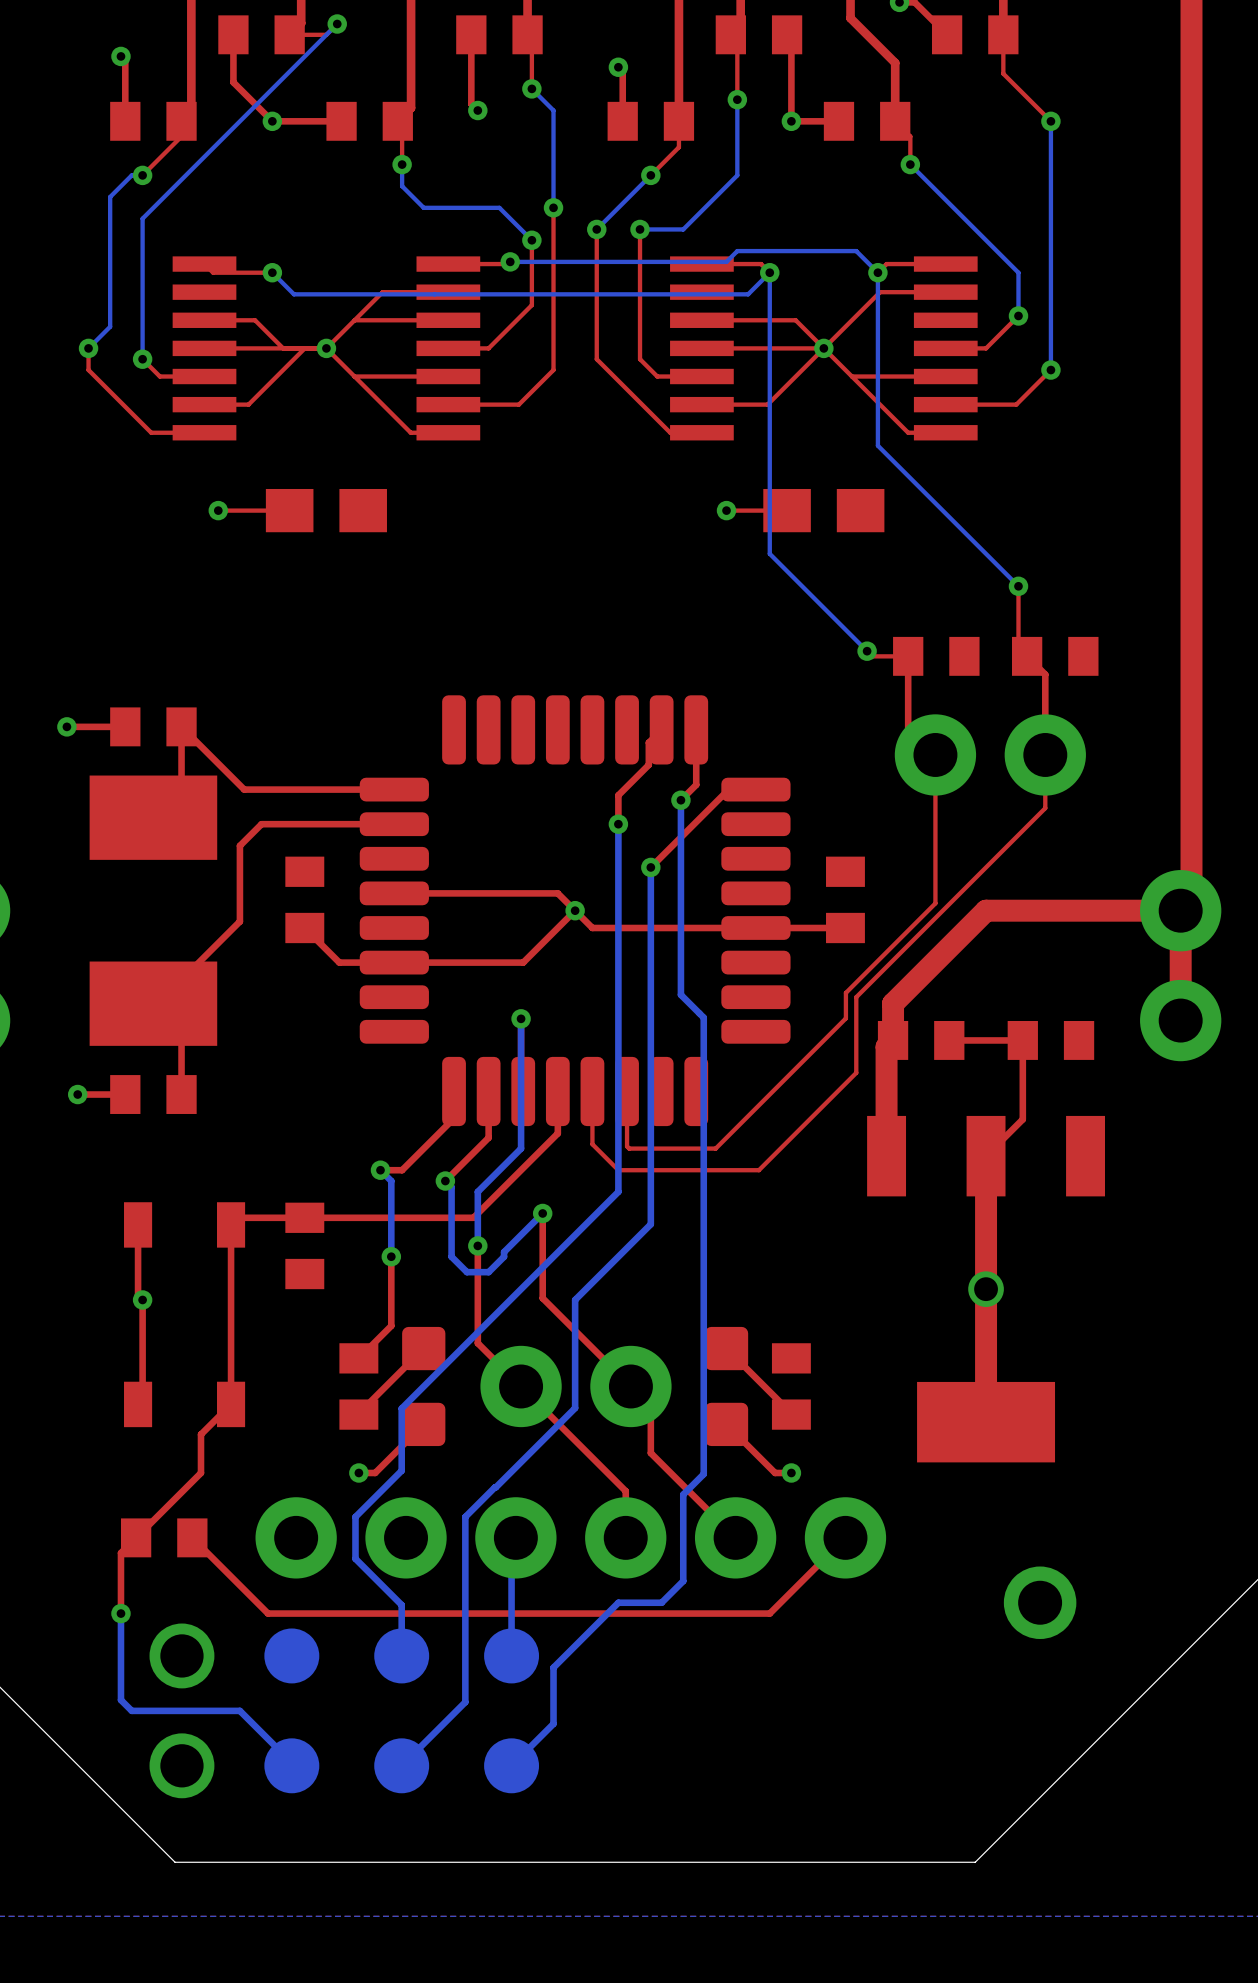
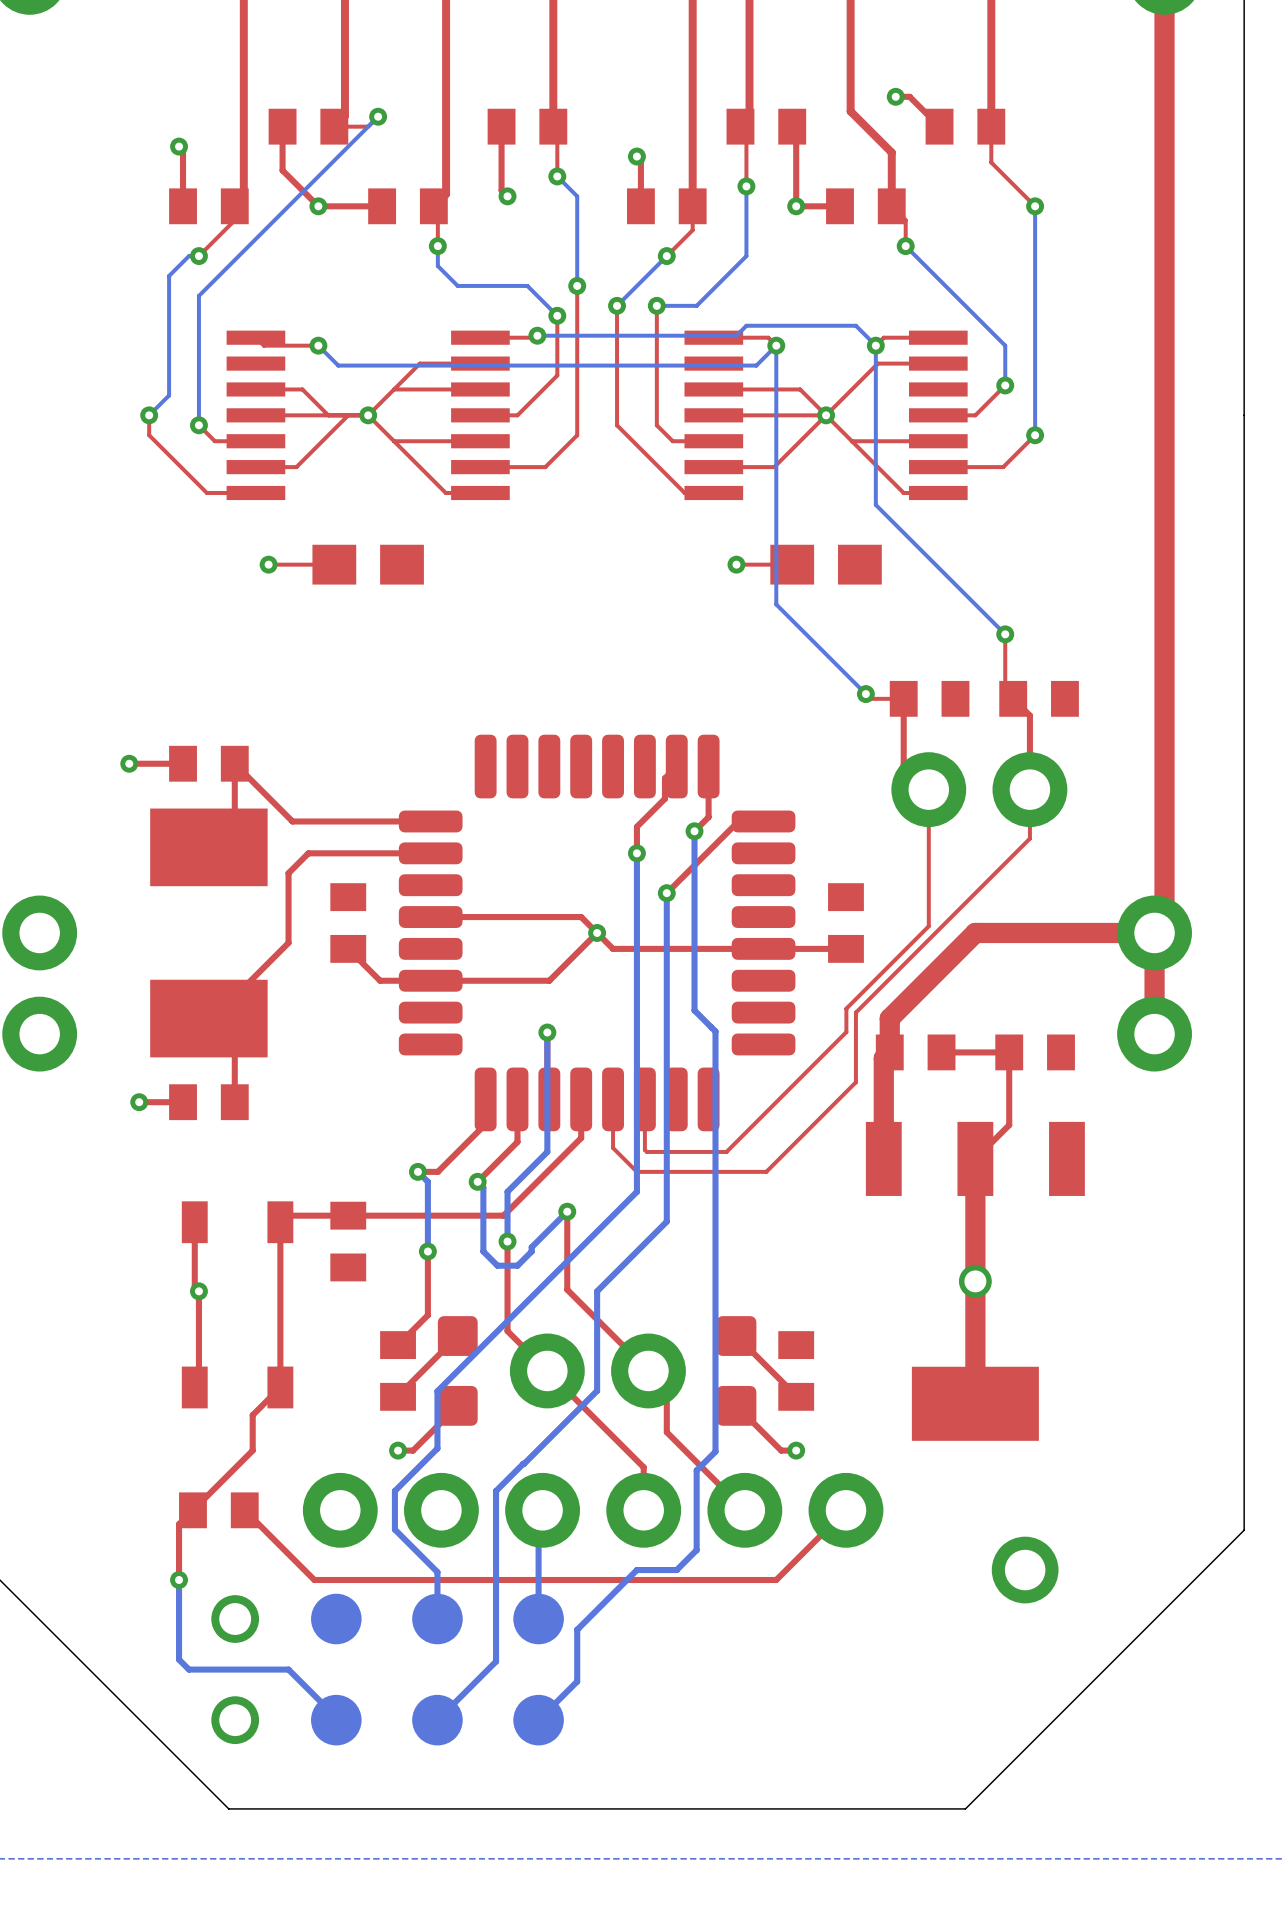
part footprint: [149, 1623, 540, 1799] -> [211, 1593, 564, 1746]

